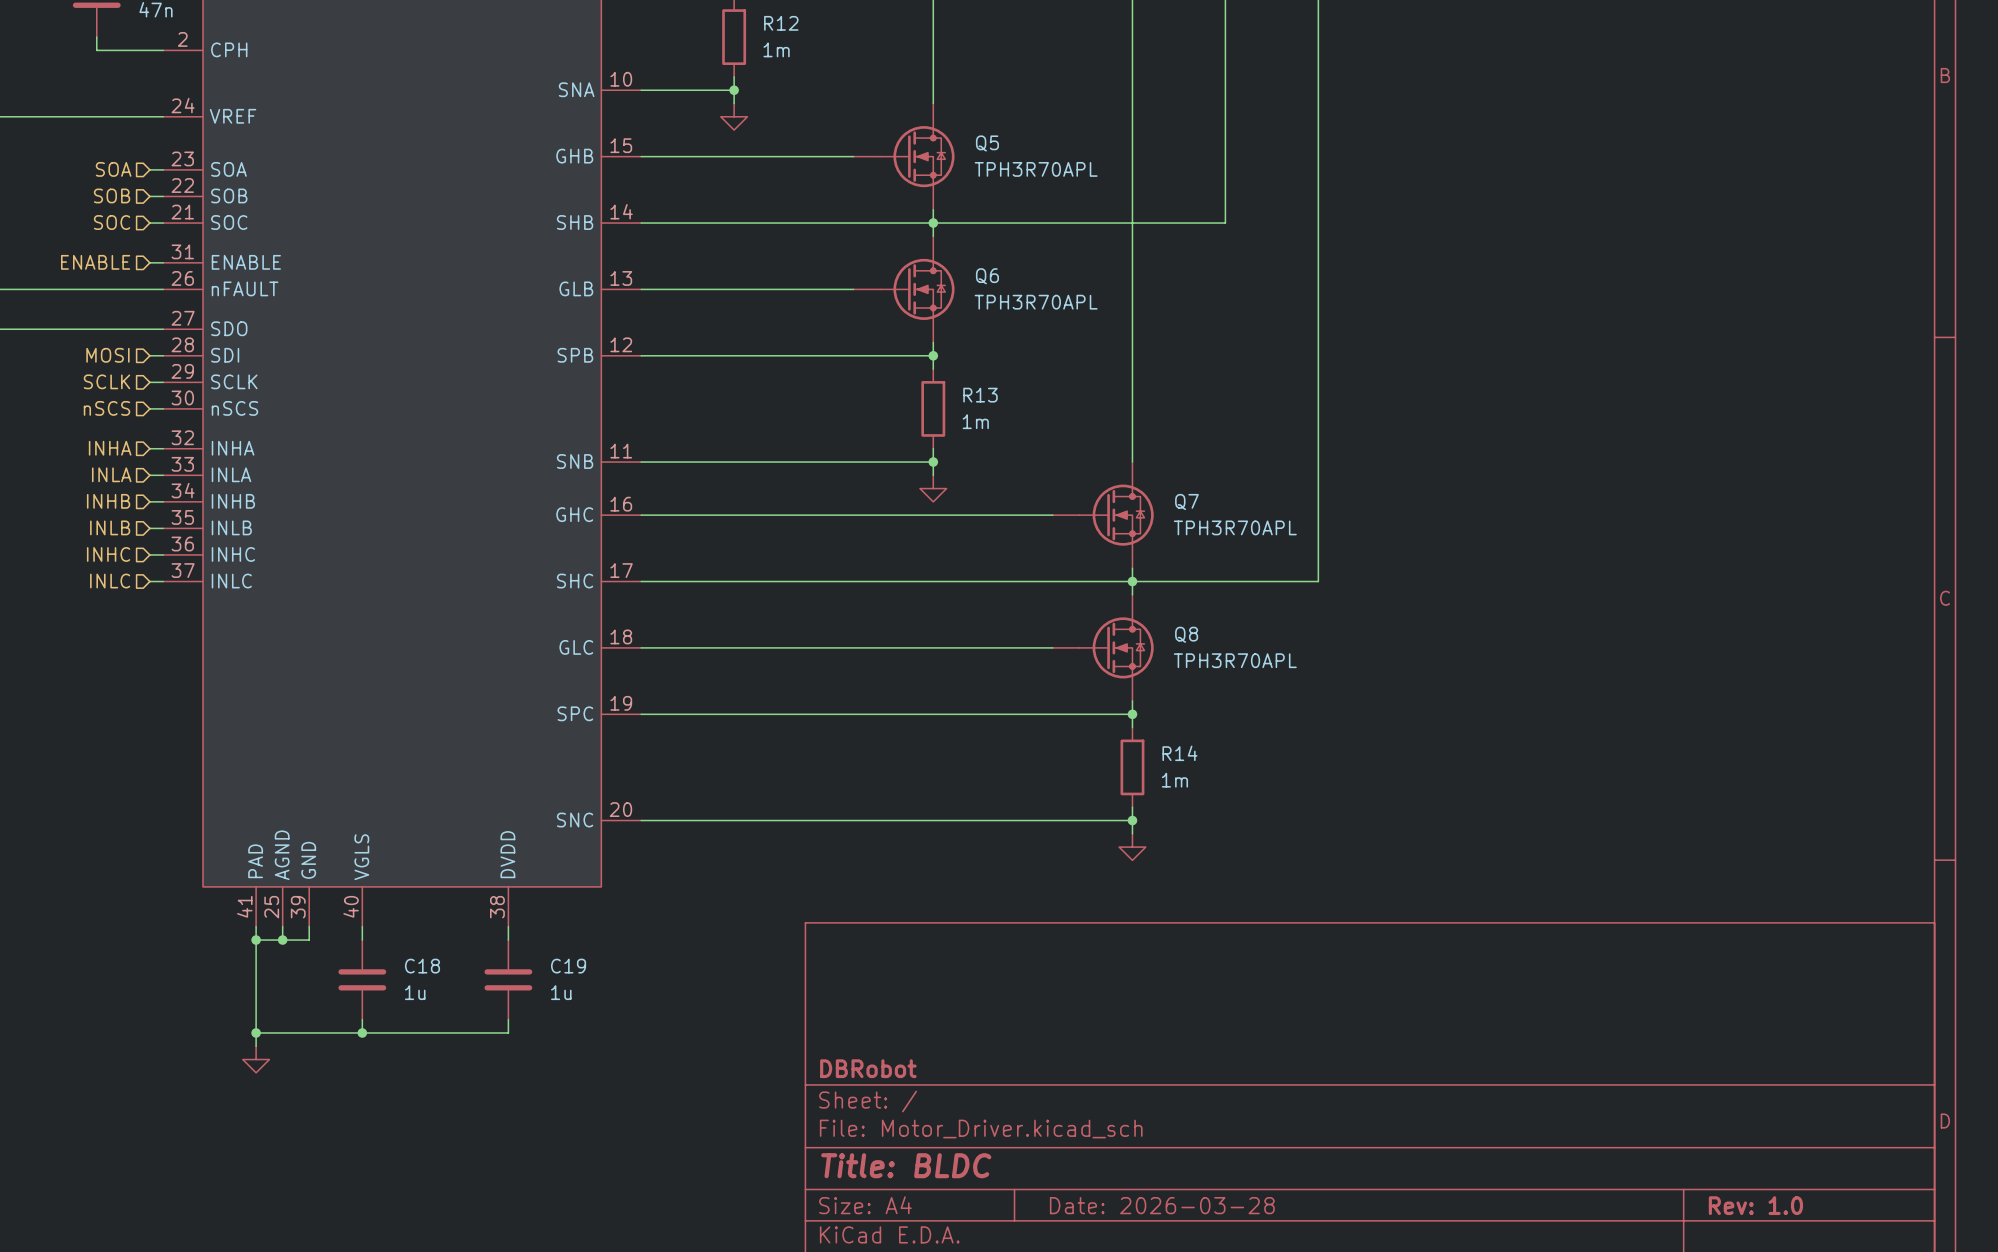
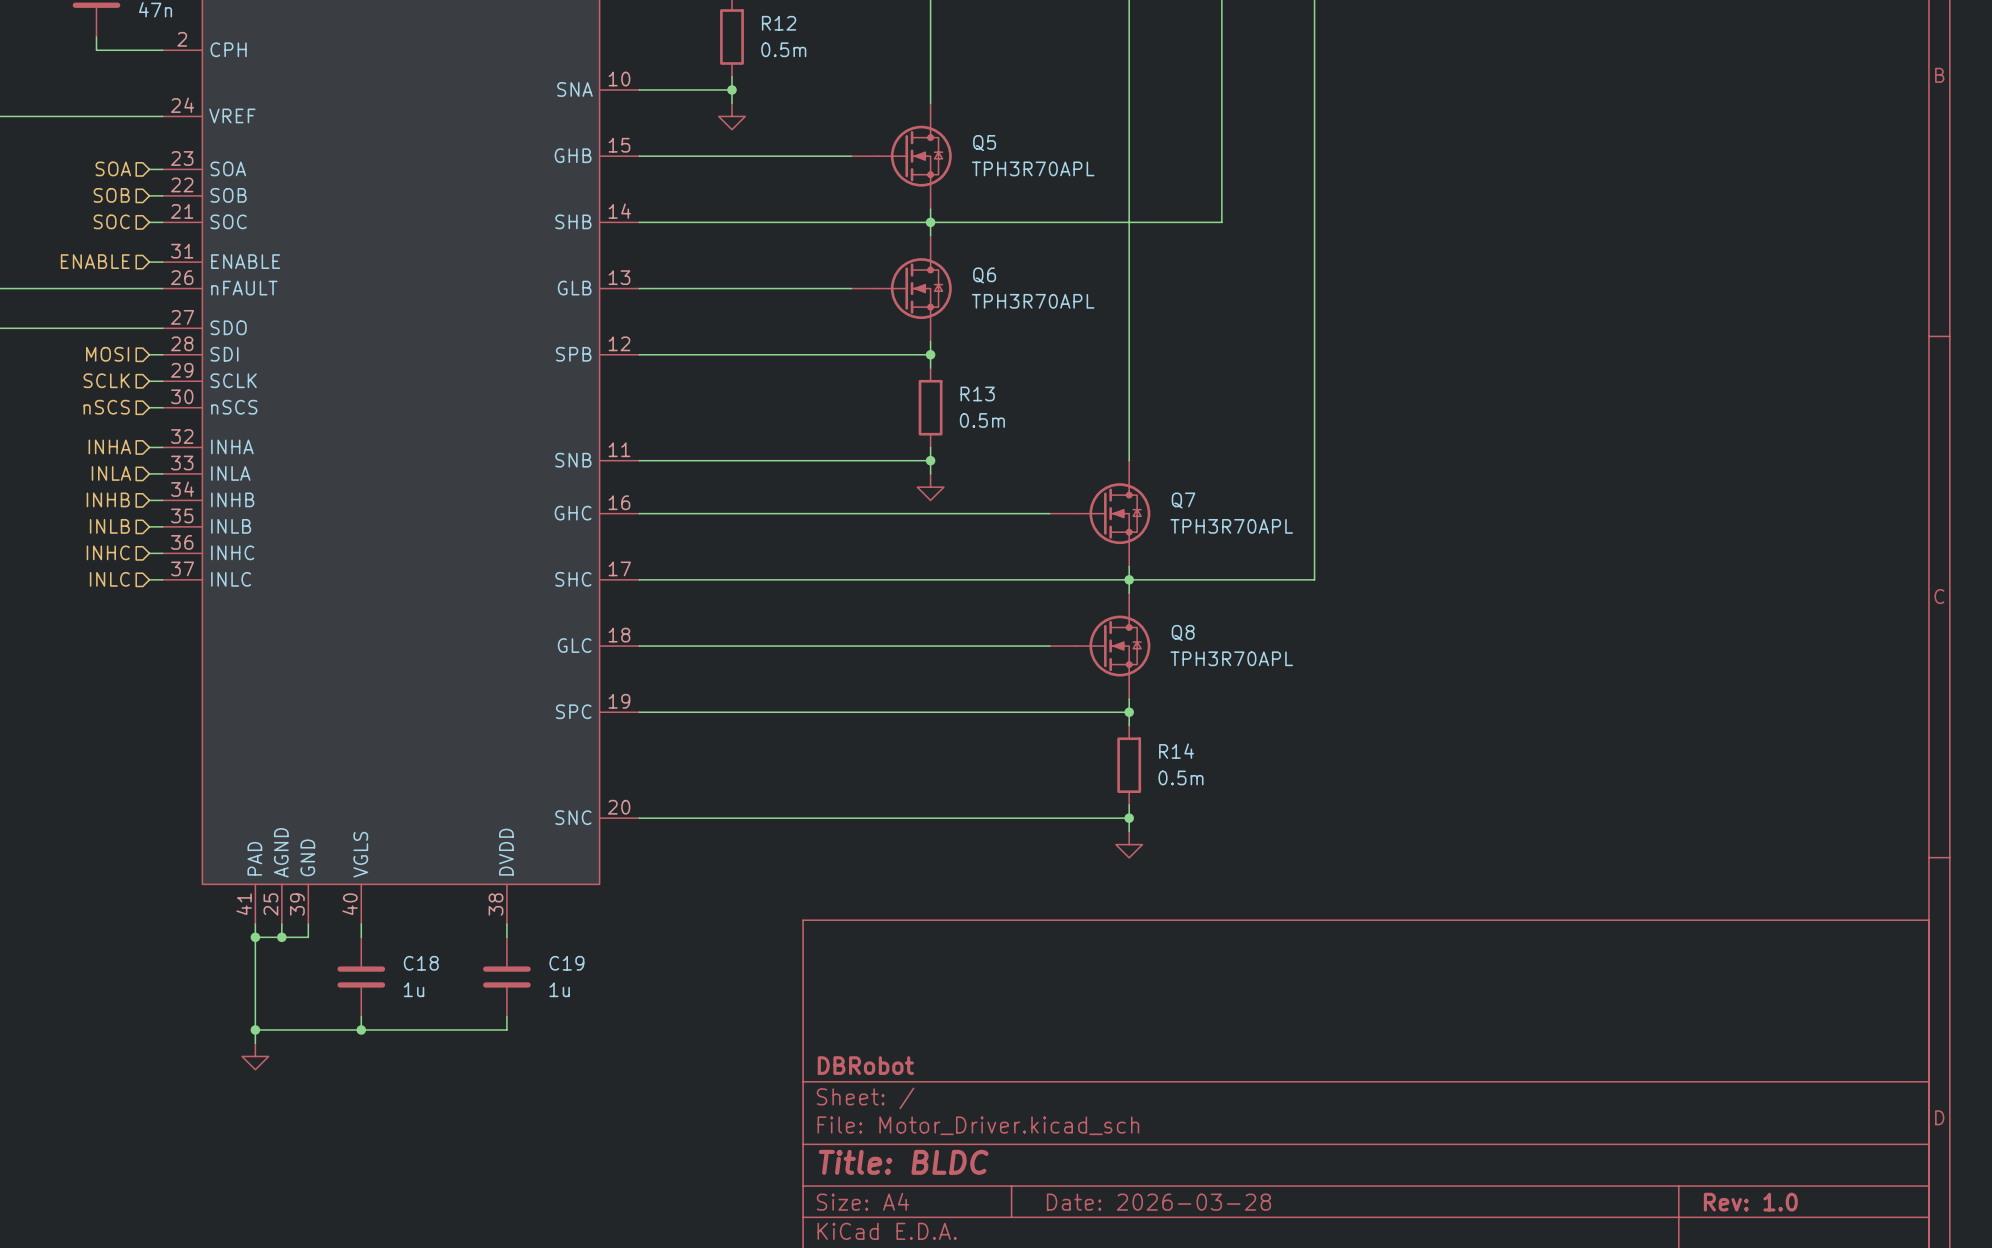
R12 value: 1m (776, 49) -> 0.5m (783, 49)
R13 value: 1m (975, 421) -> 0.5m (982, 420)
R14 value: 1m (1174, 780) -> 0.5m (1180, 777)

